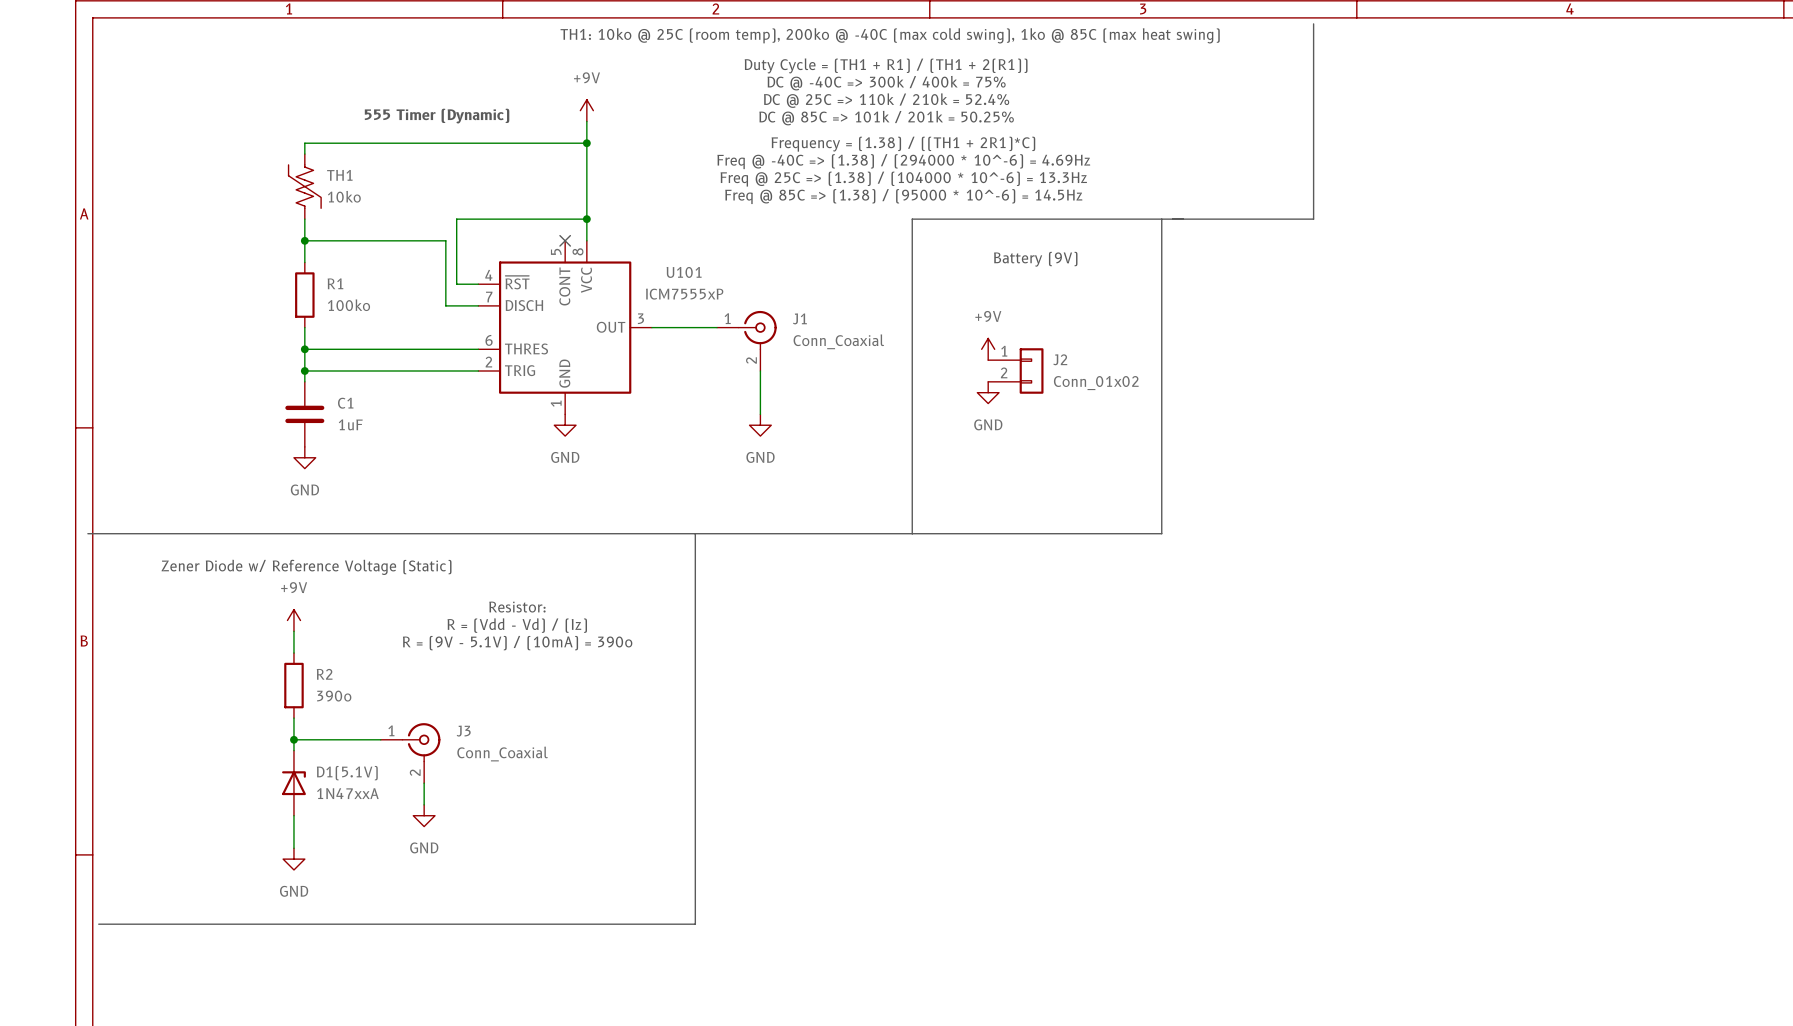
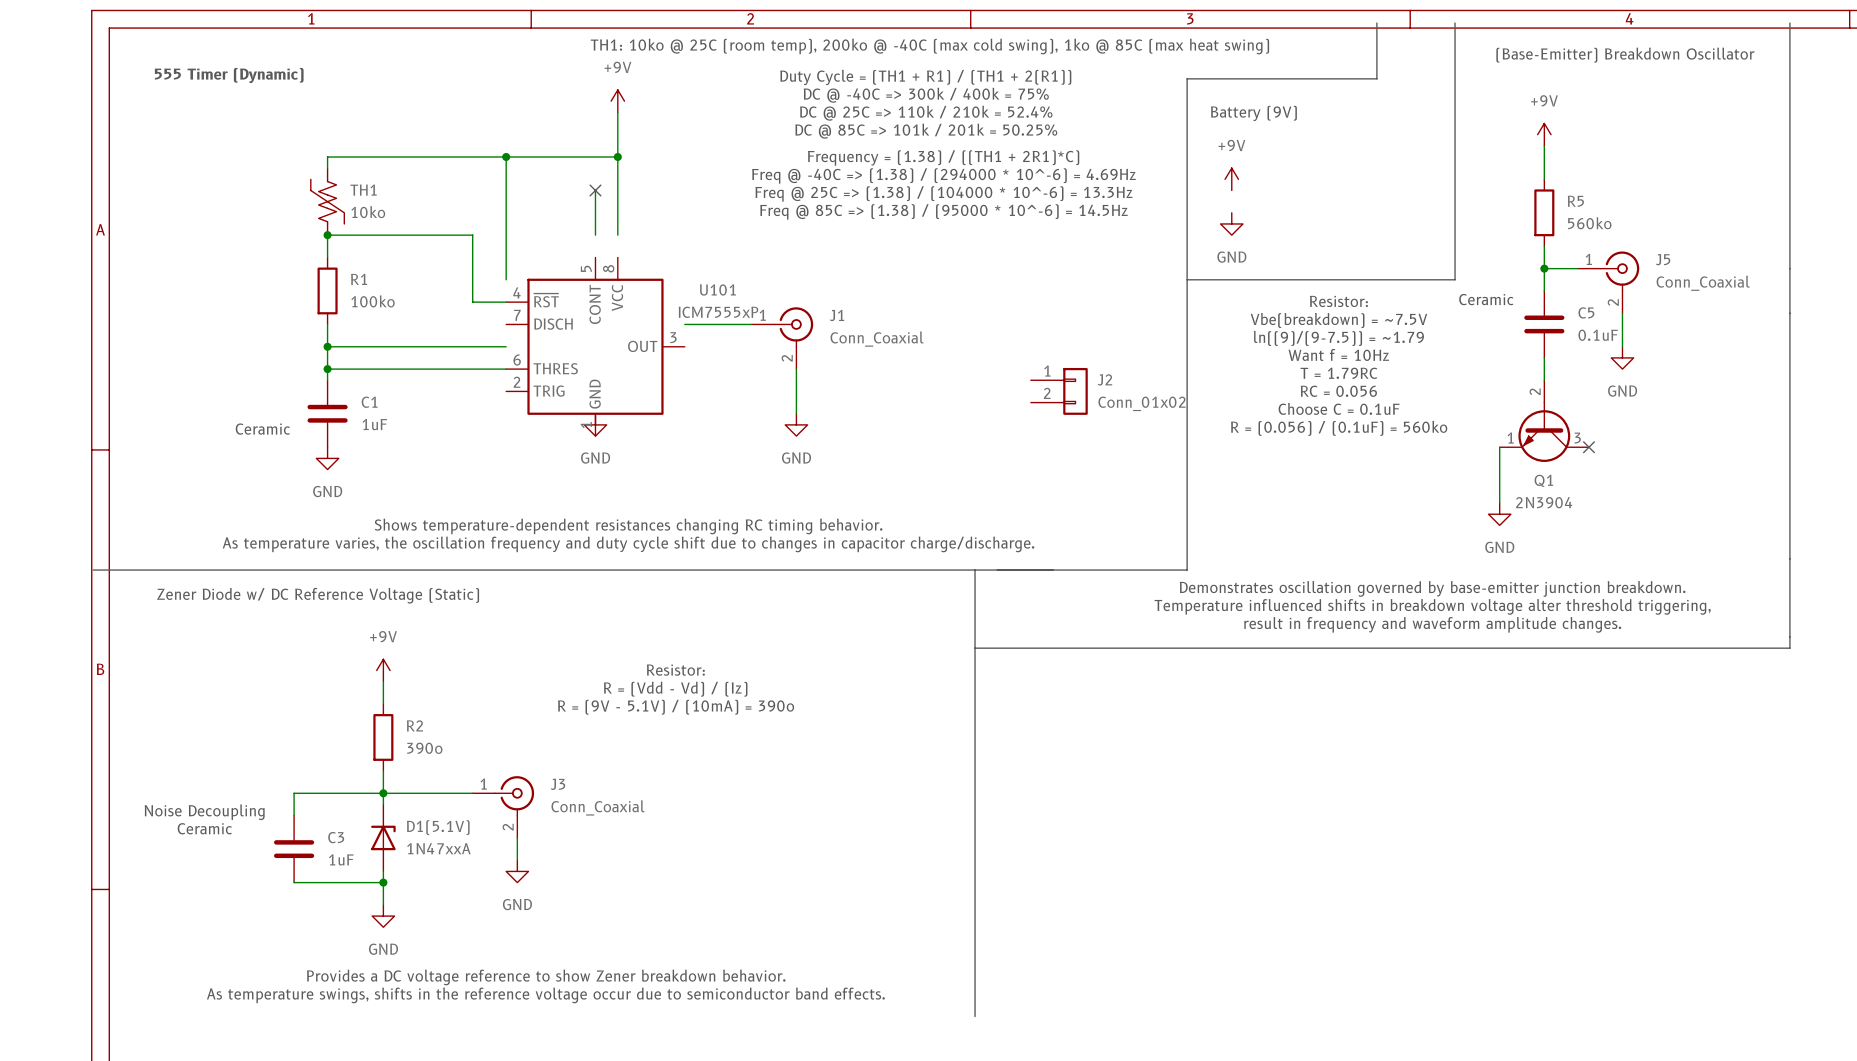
line: none -> (1376, 23) (1376, 78) (1187, 78) (1187, 570) (93, 570)
line: none -> (1455, 23) (1455, 279) (1187, 279)
line: none -> (1789, 23) (1789, 648) (975, 648)
line: (1313, 23) (1313, 219) (912, 219) (912, 533) -> none
text: none -> (Base-Emitter) Breakdown Oscillator (1625, 55)
text: none -> 555 Timer (Dynamic) (229, 75)
text: none -> Battery (9V) (1253, 113)
power symbol position: +9V (586, 110) -> +9V (617, 101)
text: 555 Timer (Dynamic) (437, 116) -> none
power symbol: none -> +9V (1544, 134)
wire: none -> (1544, 145) (1544, 179)
wire: none -> (506, 157) (506, 279)
junction: none -> (506, 157)
power symbol: none -> +9V (1231, 179)
wire: none -> (595, 190) (595, 235)
no-connect mark: none -> (595, 190)
R5: none -> 560ko (1544, 212)
power symbol: none -> GND (1231, 223)
junction: (586, 219) -> none
line: (1161, 219) (1161, 533) (87, 533) -> none
wire: none -> (1544, 246) (1544, 290)
junction position: (304, 240) -> (327, 235)
wire: (445, 240) (304, 240) (304, 262) -> (472, 257) (472, 235) (327, 235)
no-connect mark: (565, 240) -> none
wire: (586, 240) (586, 219) (456, 219) (456, 284) -> none
wire: none -> (1544, 268) (1577, 268)
junction: none -> (1544, 268)
text: Battery (9V) (1035, 259) -> none
J5: none -> Conn_Coaxial (1608, 282)
text: none -> Ceramic (1486, 299)
text: none -> Resistor: (1338, 301)
wire: (445, 284) (445, 305) (478, 305) -> (472, 302) (483, 302)
R1 position: (304, 295) -> (327, 290)
wire: none -> (1622, 313) (1622, 346)
text: none -> Vbe(breakdown) = ~7.5V (1338, 320)
wire: none -> (327, 324) (327, 346) (506, 346)
C5: none -> 0.1uF (1544, 324)
text: none -> ln((9)/(9-7.5)) = ~1.79 (1338, 338)
junction: none -> (327, 346)
wire: (651, 327) (717, 327) -> (684, 324) (751, 324)
text: none -> Want f = 10Hz (1338, 354)
wire: none -> (1544, 357) (1544, 380)
power symbol: none -> GND (1622, 357)
J1 position: (746, 340) -> (782, 338)
power symbol: +9V (988, 349) -> none
text: none -> T = 1.79RC (1338, 373)
wire: (304, 370) (478, 370) -> none
junction: (304, 370) -> none
text: none -> RC = 0.056 (1338, 391)
text: none -> Choose C = 0.1uF (1339, 408)
power symbol: GND (988, 392) -> none
Q1: none -> 2N3904 (1544, 421)
text: none -> R = (0.056) / (0.1uF) = 560ko (1339, 428)
text: none -> Ceramic (262, 429)
C1 position: (304, 414) -> (327, 413)
power symbol position: GND (565, 425) -> GND (595, 424)
power symbol position: GND (760, 425) -> GND (796, 424)
wire: none -> (1499, 447) (1499, 503)
no-connect mark: none -> (1588, 447)
power symbol position: GND (304, 457) -> GND (327, 458)
power symbol: none -> GND (1499, 514)
text: none -> Shows temperature-dependent resistances changing RC timing behavior. (628, 526)
text: none -> As temperature varies, the oscillation frequency and duty cycle shift due to changes in capacitor charge/discharge. (628, 544)
line: (695, 533) (695, 924) (98, 924) -> none
line: none -> (975, 570) (975, 1016)
text: none -> Demonstrates oscillation governed by base-emitter junction breakdown. (1432, 588)
text: Zener Diode w/ Reference Voltage (Static) (306, 567) -> Zener Diode w/ DC Reference Voltage (Static) (318, 595)
text: none -> Temperature influenced shifts in breakdown voltage alter threshold triggering, (1432, 606)
text: none -> result in frequency and waveform amplitude changes. (1432, 624)
text position: Resistor: (517, 607) -> Resistor: (675, 670)
power symbol position: +9V (293, 620) -> +9V (383, 670)
text position: R = (Vdd - Vd) / (Iz) (517, 625) -> R = (Vdd - Vd) / (Iz) (675, 689)
wire: (293, 631) (293, 653) -> (383, 681) (383, 703)
text position: R = (9V - 5.1V) / (10mA) = 390o (517, 643) -> R = (9V - 5.1V) / (10mA) = 390o (676, 707)
R2 position: (293, 685) -> (383, 737)
wire: (293, 718) (293, 750) -> (383, 770) (383, 804)
wire: (293, 739) (380, 739) -> (294, 882) (383, 882)
junction: (293, 739) -> none
J3 position: (410, 753) -> (503, 807)
junction: none -> (383, 793)
wire: none -> (472, 793) (294, 793) (294, 815)
text: none -> Noise Decoupling (204, 812)
D1(5.1V) position: (293, 783) -> (383, 837)
wire: (424, 783) (424, 804) -> (517, 837) (517, 860)
text: none -> Ceramic (204, 828)
C3: none -> 1uF (294, 849)
wire: (293, 815) (293, 848) -> (383, 871) (383, 904)
power symbol: GND (424, 815) -> none
power symbol: none -> GND (517, 871)
junction: none -> (383, 882)
power symbol: GND (293, 859) -> none
power symbol: none -> GND (383, 916)
text: none -> Provides a DC voltage reference to show Zener breakdown behavior. (546, 977)
text: none -> As temperature swings, shifts in the reference voltage occur due to semiconductor band effects. (545, 995)

